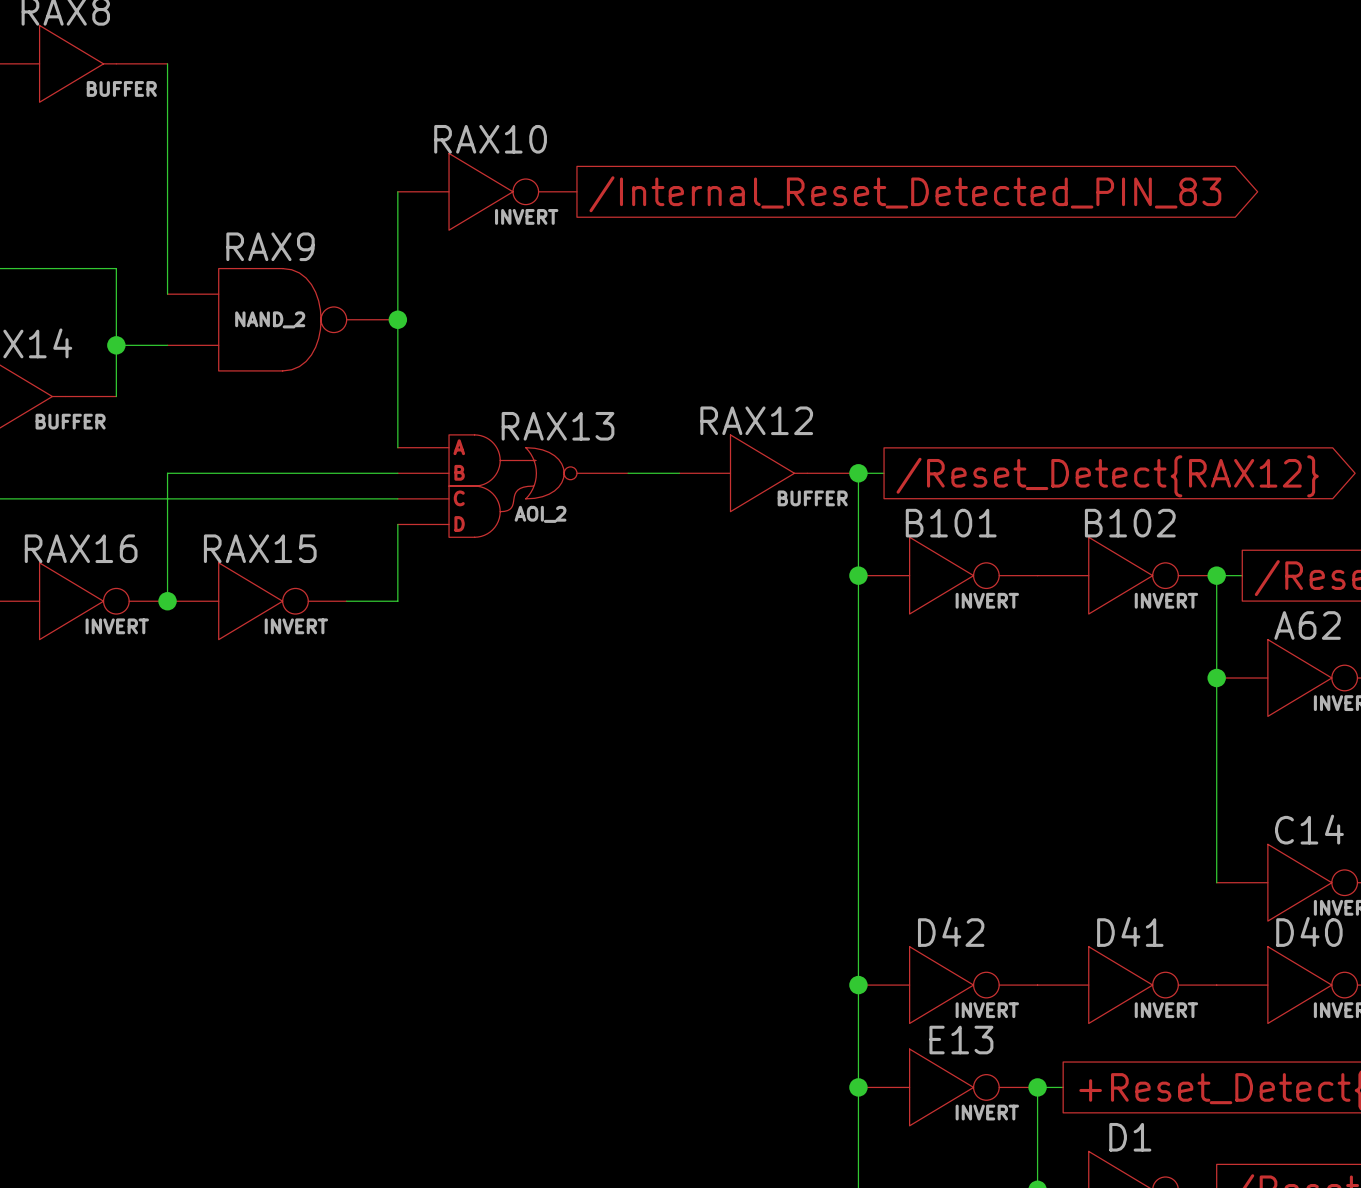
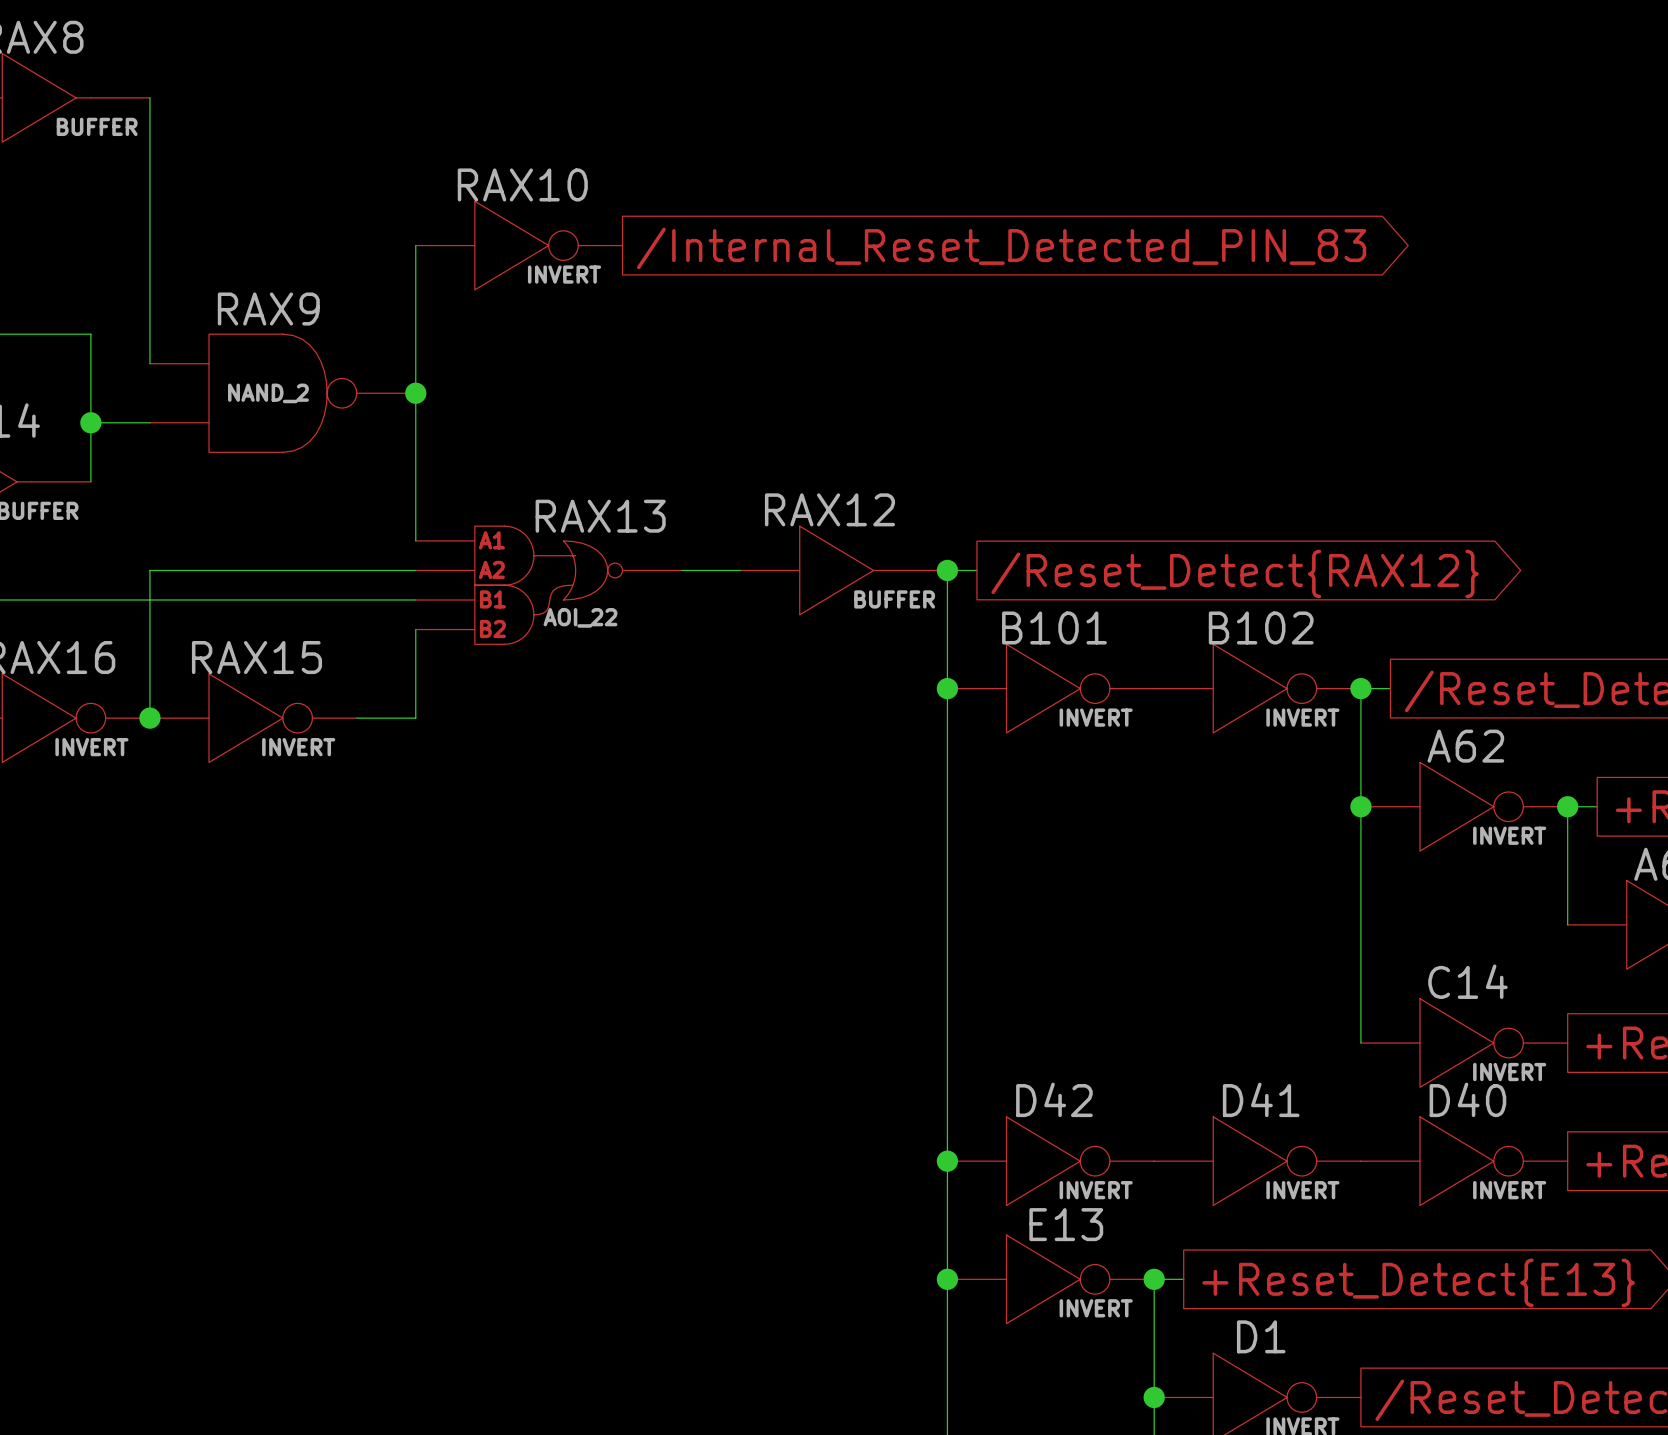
RAX13 text: A (459, 447) -> none
RAX13 text: none -> A1 (491, 540)
RAX13 text: B (459, 472) -> none
RAX13 text: none -> A2 (491, 569)
RAX13 text: C (459, 498) -> none
RAX13 text: none -> B1 (492, 599)
RAX13 value: AOI_2 (540, 514) -> AOI_22 (580, 617)
RAX13 text: D (459, 523) -> none
RAX13 text: none -> B2 (492, 628)

